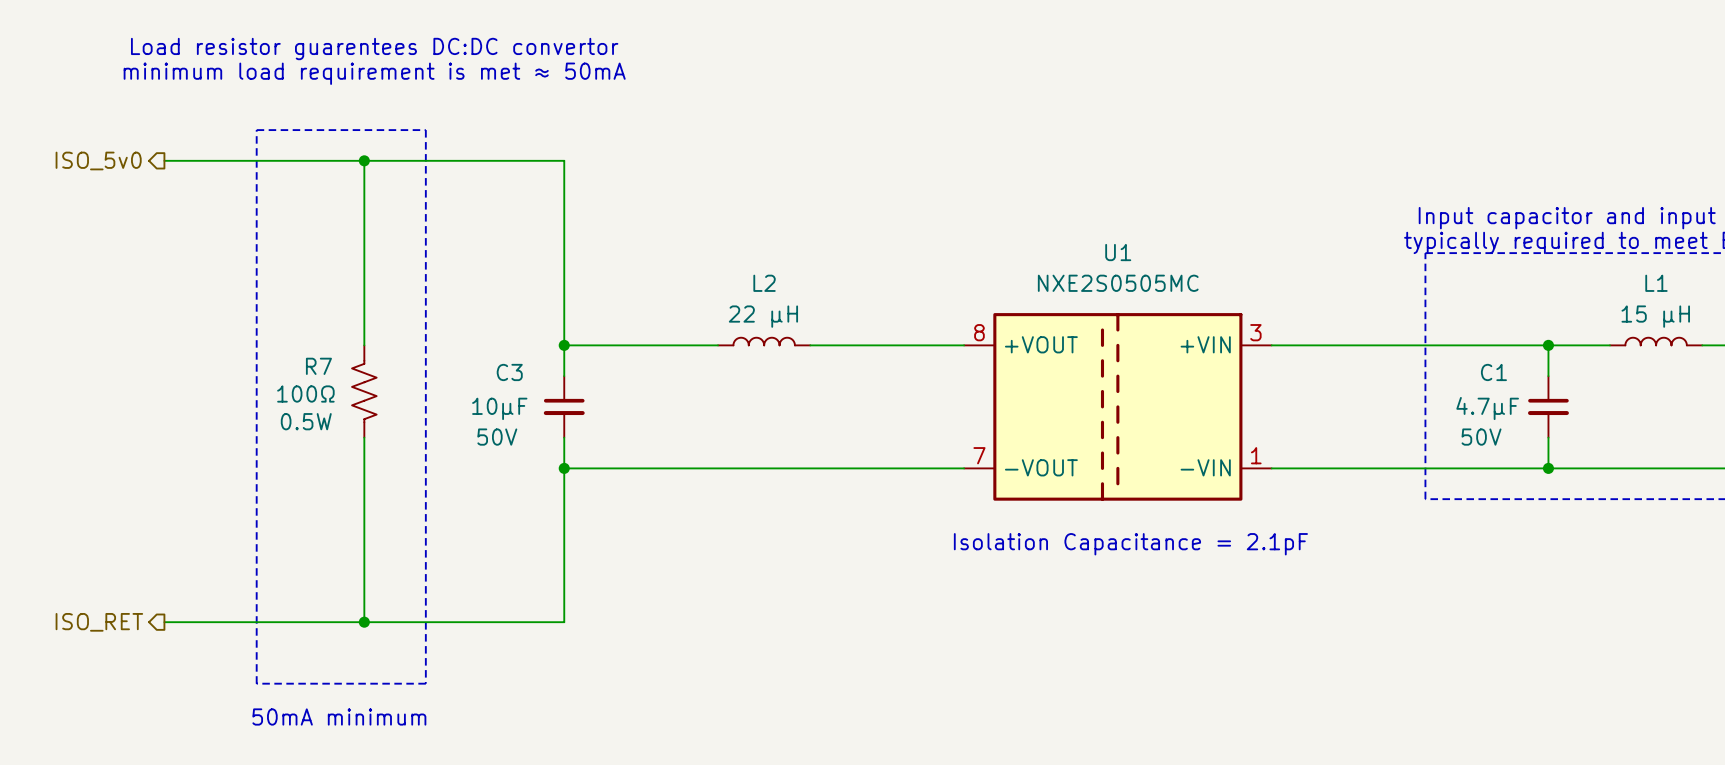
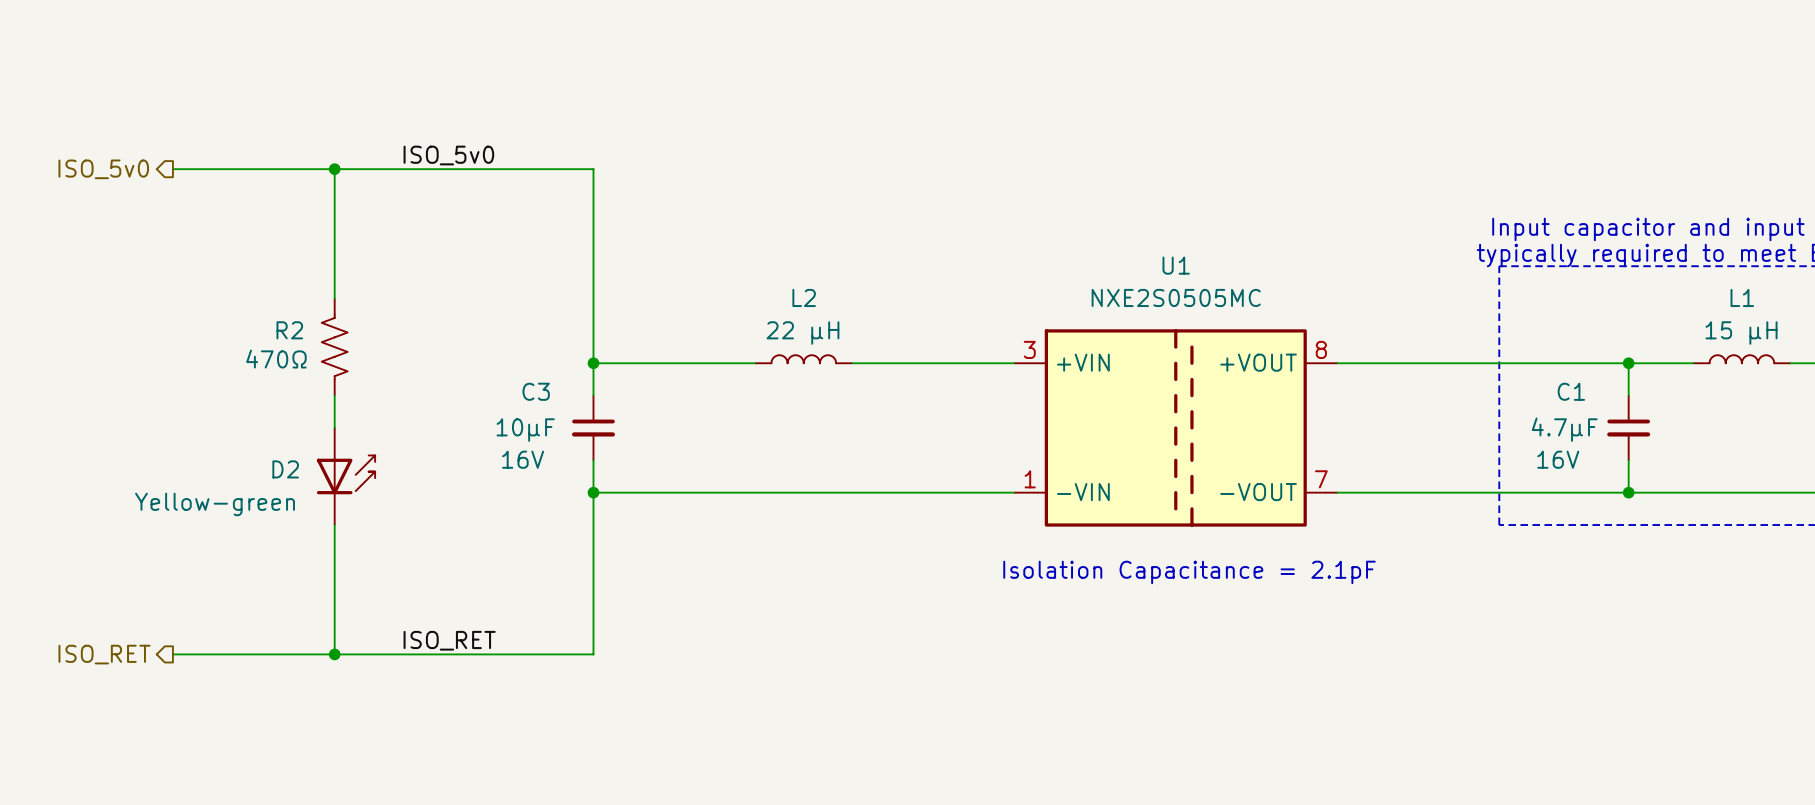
text: Load resistor guarentees DC:DC convertor (374, 48) -> none
text: minimum load requirement is met ≈ 50mA (374, 73) -> none
line: (256, 130) (425, 130) (425, 683) (256, 683) (256, 130) -> none
label: none -> ISO_5v0 (448, 155)
wire: none -> (334, 169) (334, 298)
wire: (364, 160) (364, 345) -> none
junction position: (364, 160) -> (334, 169)
R2: none -> 470Ω (334, 347)
wire: none -> (334, 395) (334, 427)
R7: 100Ω (364, 391) -> none
U1 flip: as is (1117, 406) -> left-right (1175, 427)
wire: (364, 437) (364, 622) -> none
C3 text: 50V (497, 437) -> 16V (523, 459)
C1 text: 50V (1481, 437) -> 16V (1558, 459)
D2: none -> Yellow-green (346, 476)
wire: none -> (334, 525) (334, 654)
label: none -> ISO_RET (449, 640)
junction position: (364, 622) -> (334, 654)
text: 50mA minimum (339, 717) -> none

